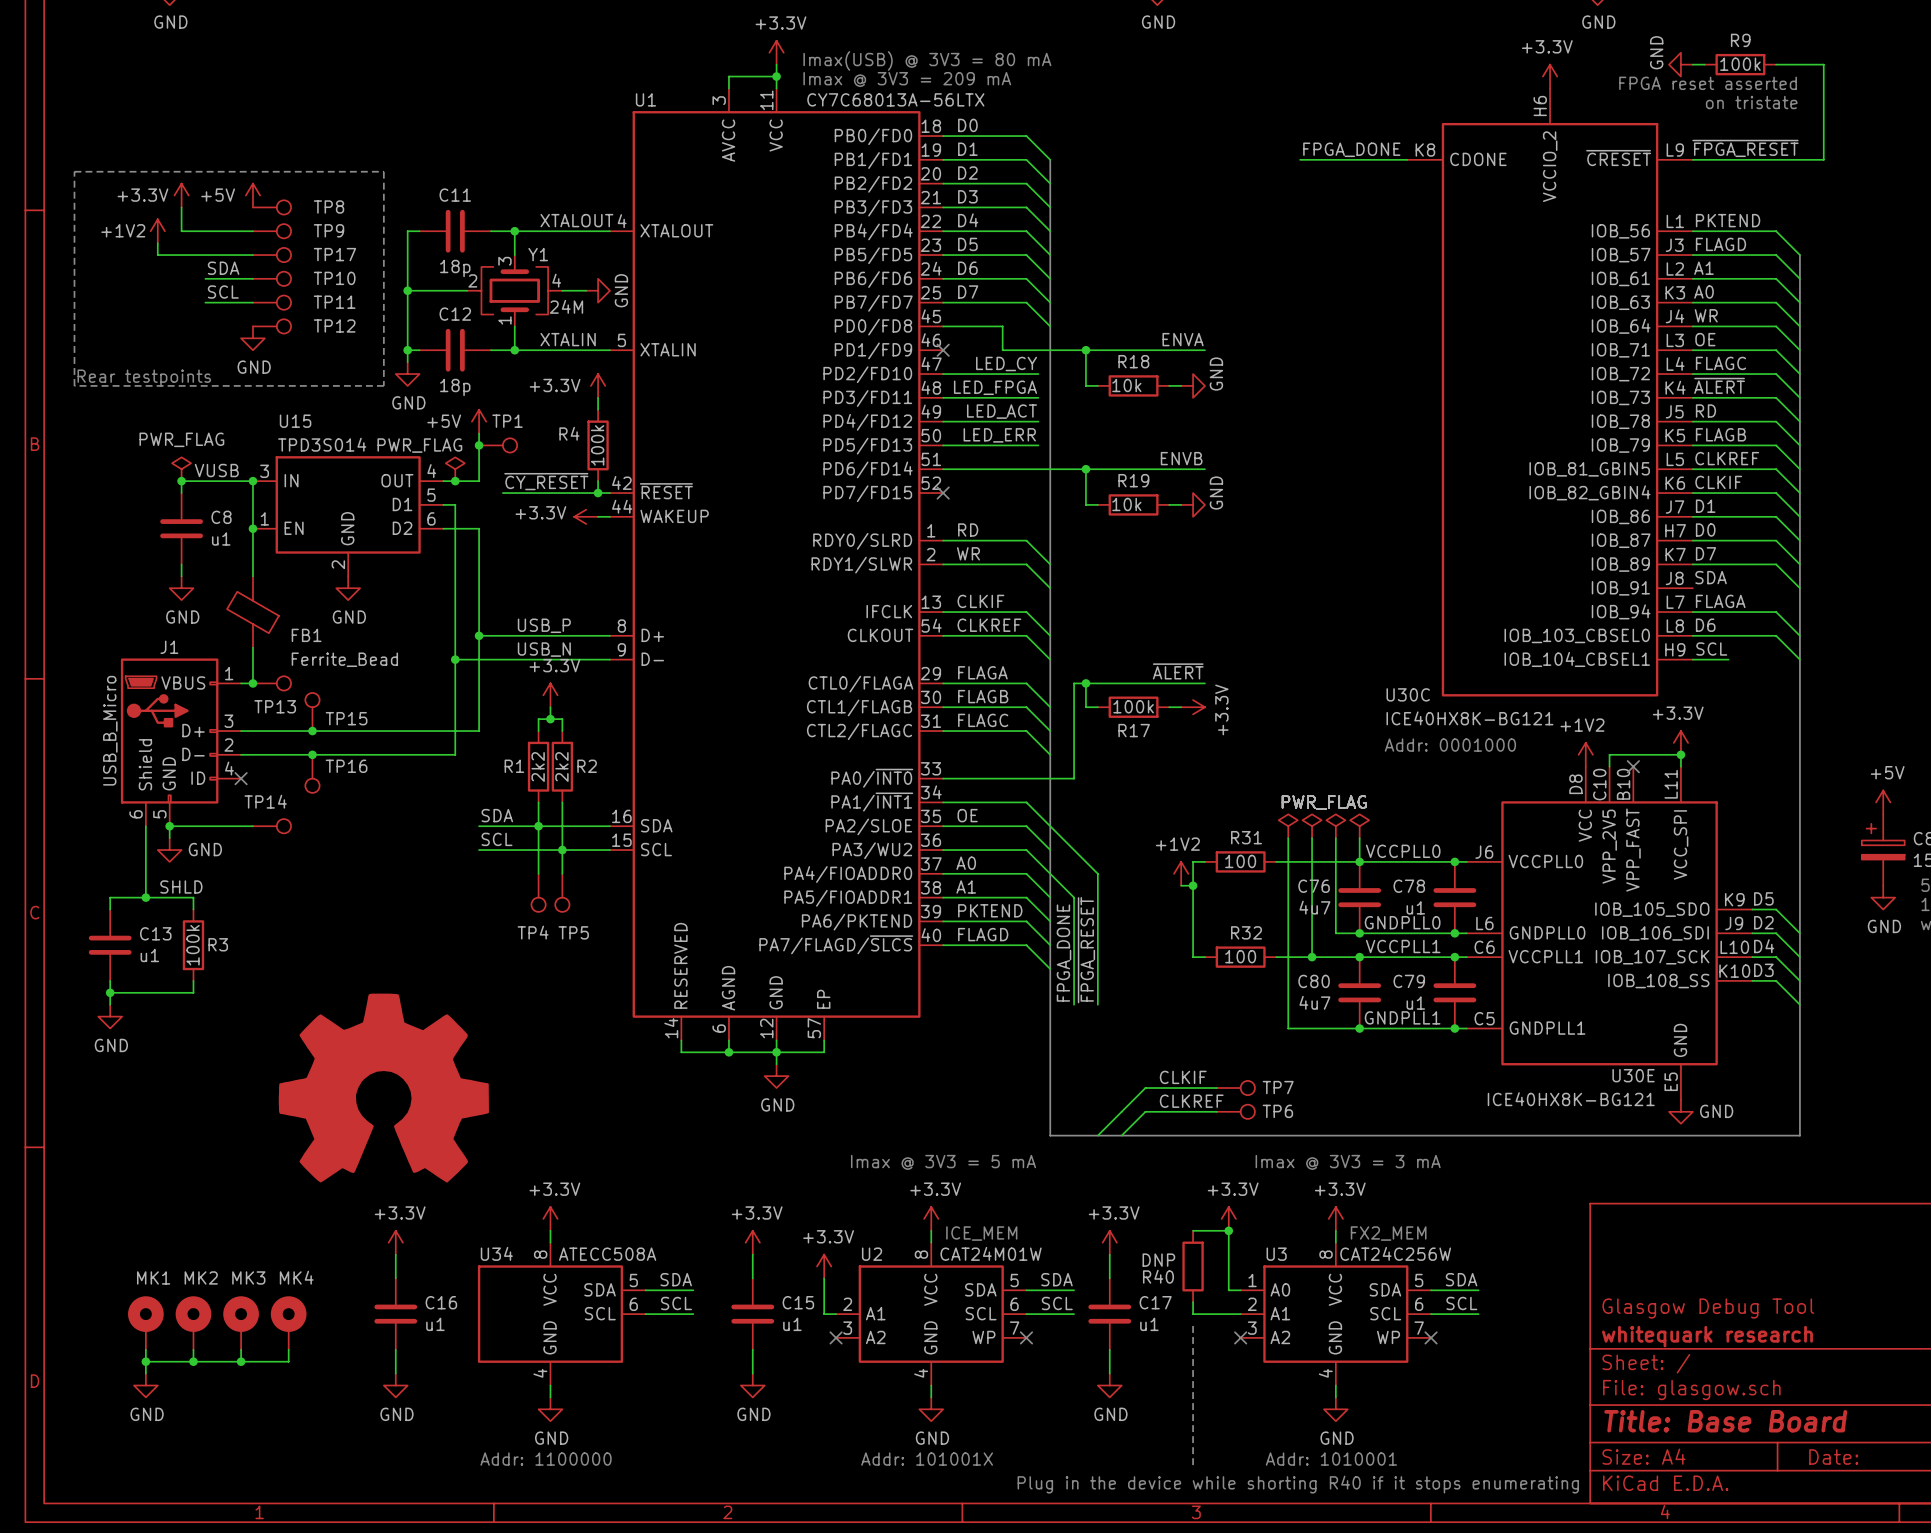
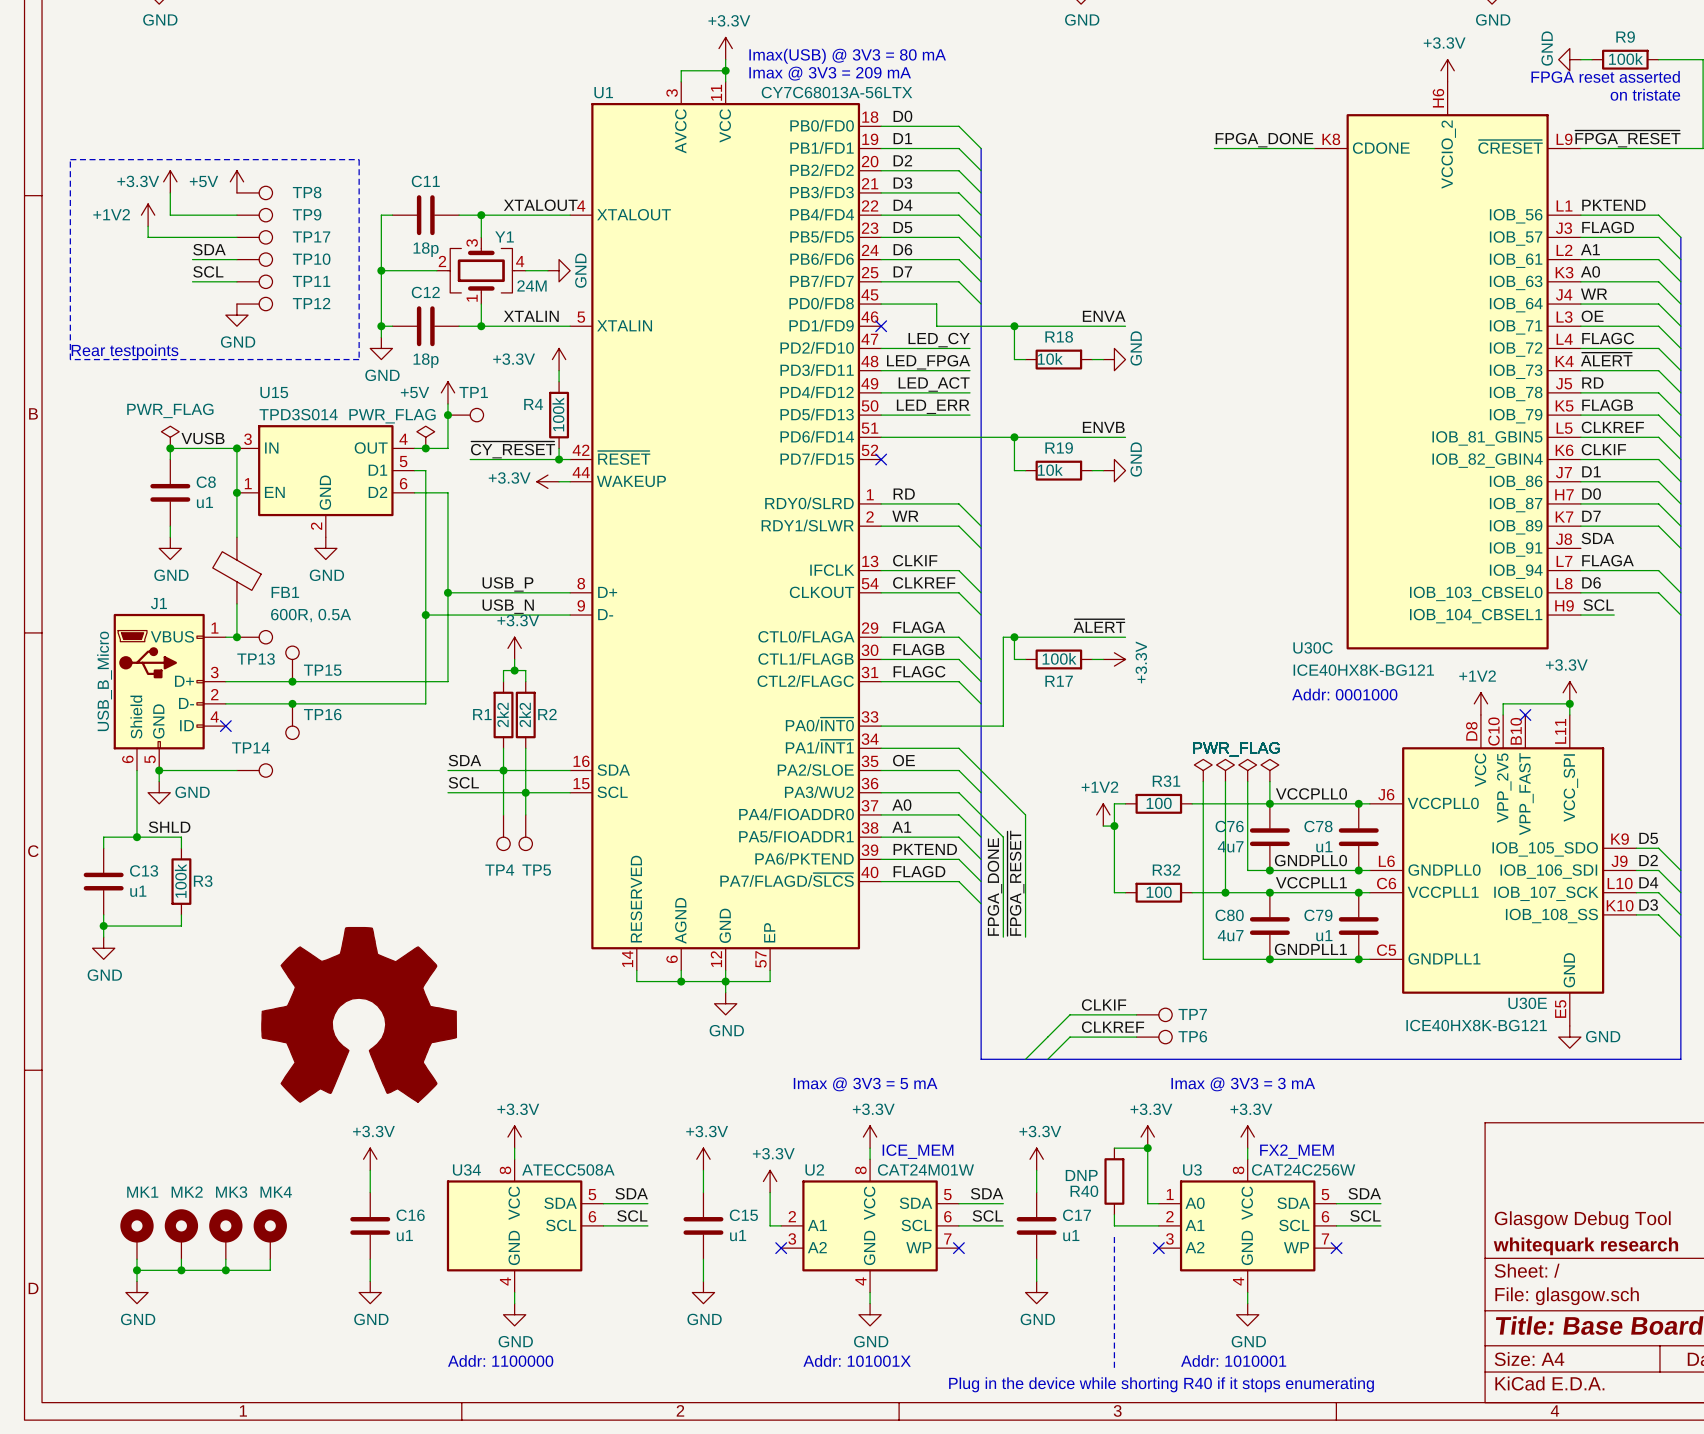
FB1 value: Ferrite_Bead (344, 659) -> 600R, 0.5A (311, 615)

